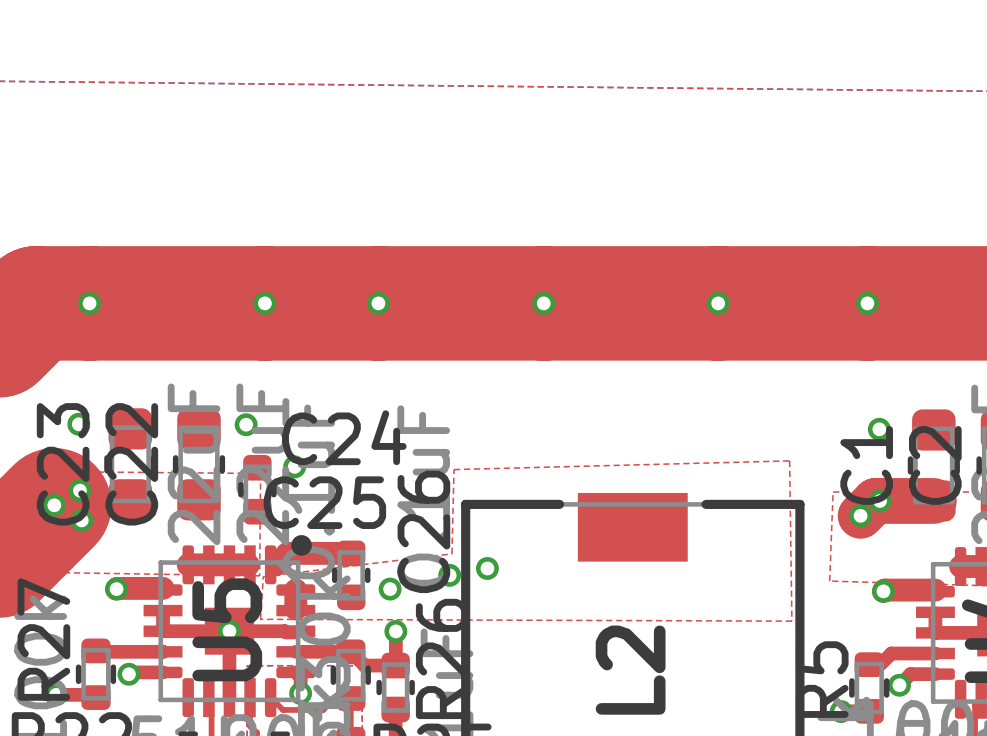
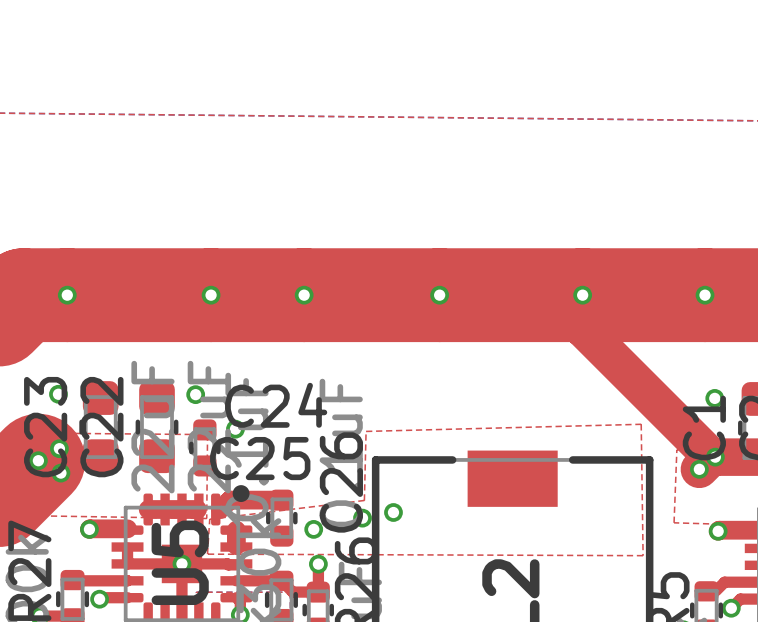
top track: none -> (582, 295) (582, 328) (711, 457)

